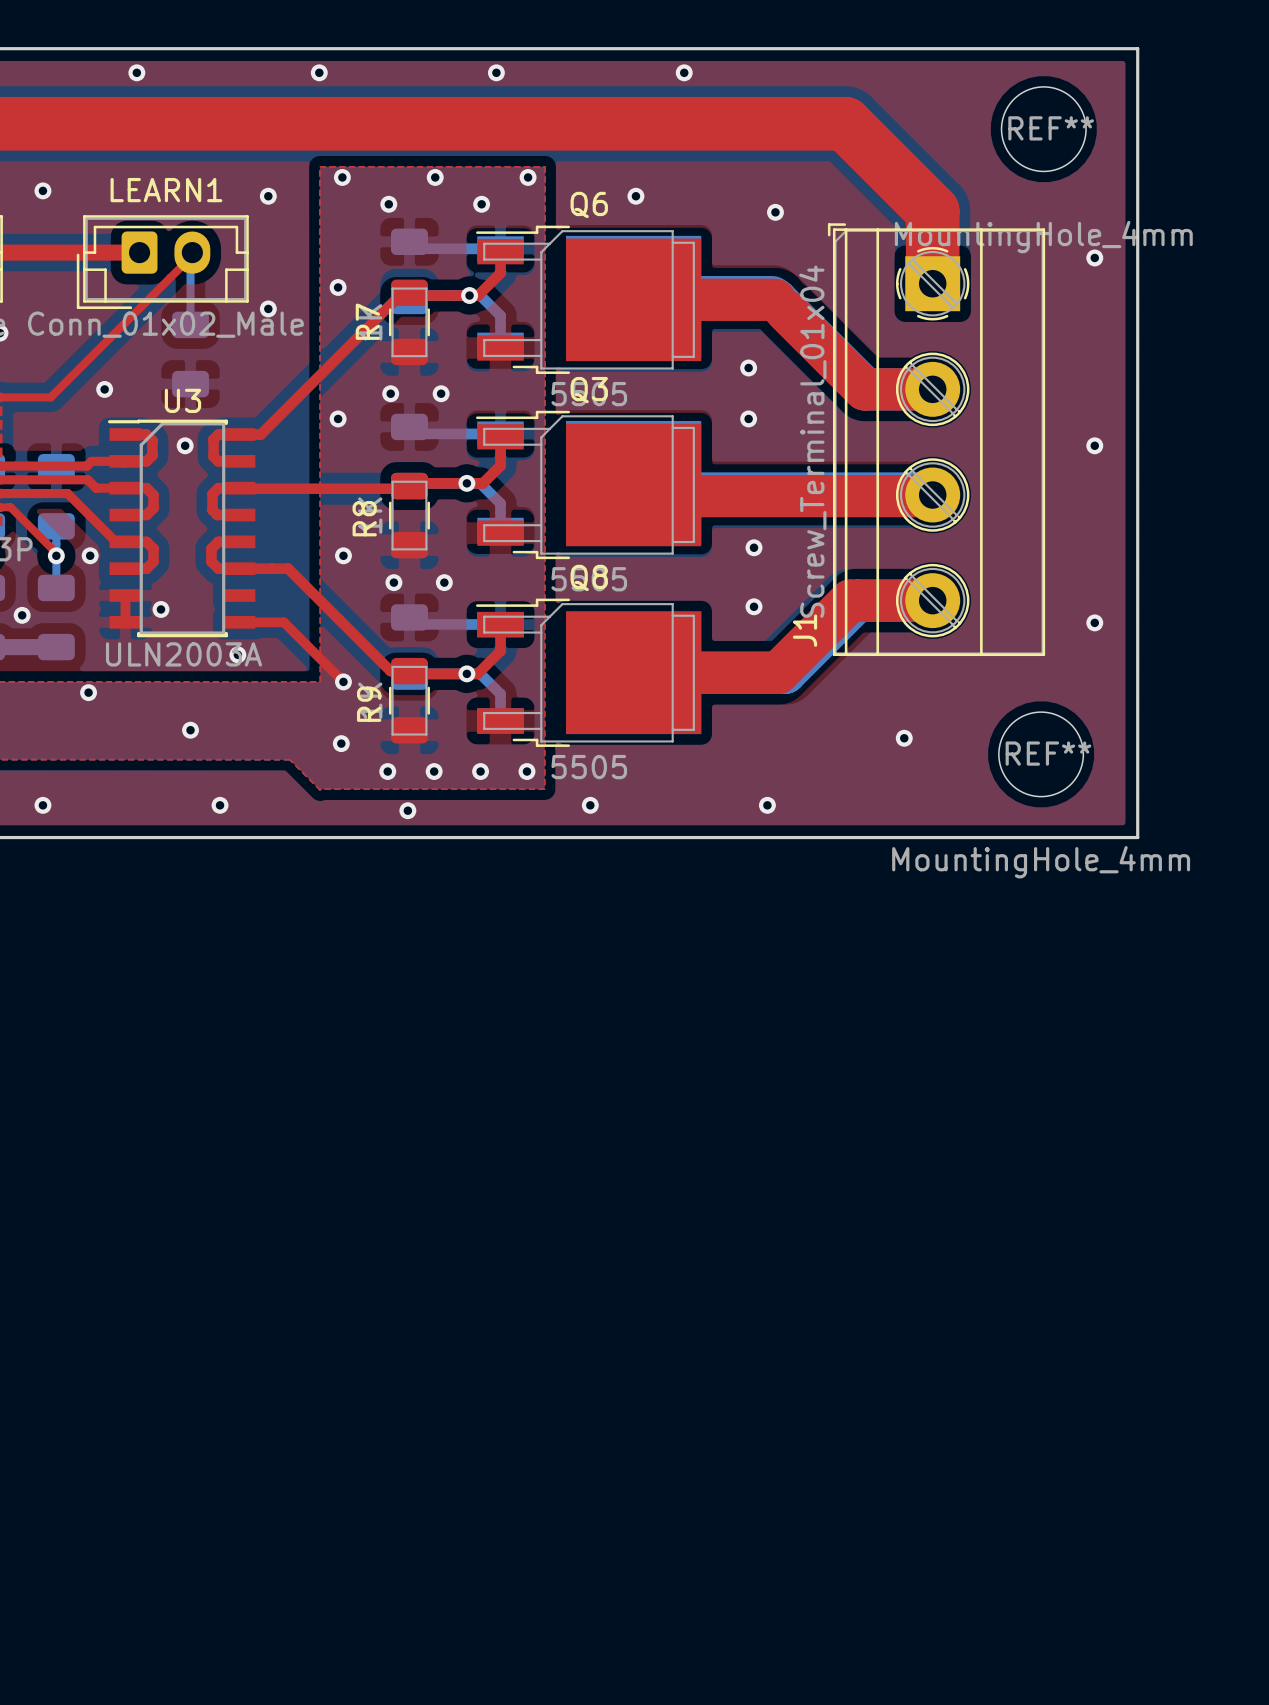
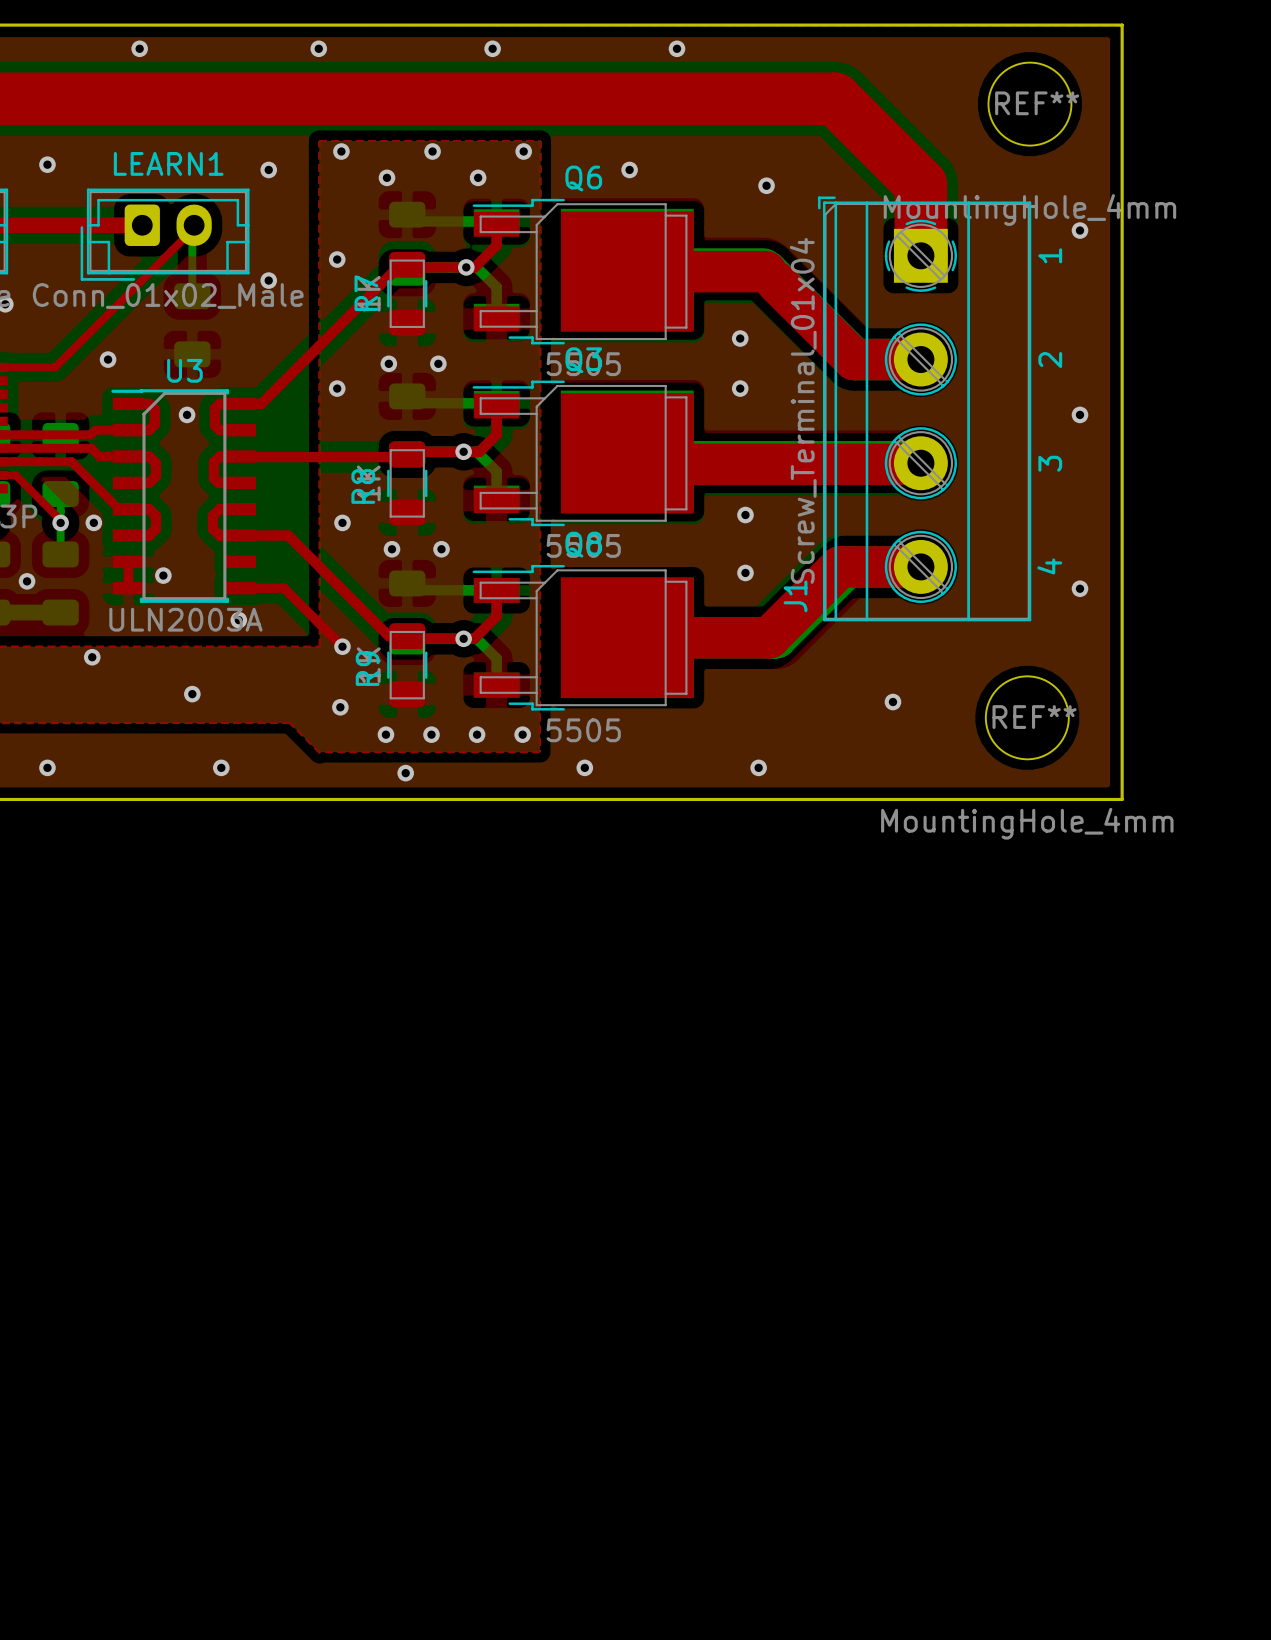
text: none -> 1 (1050, 255)
text: none -> 2 (1050, 360)
text: none -> 3 (1050, 463)
text: none -> 4 (1049, 566)

